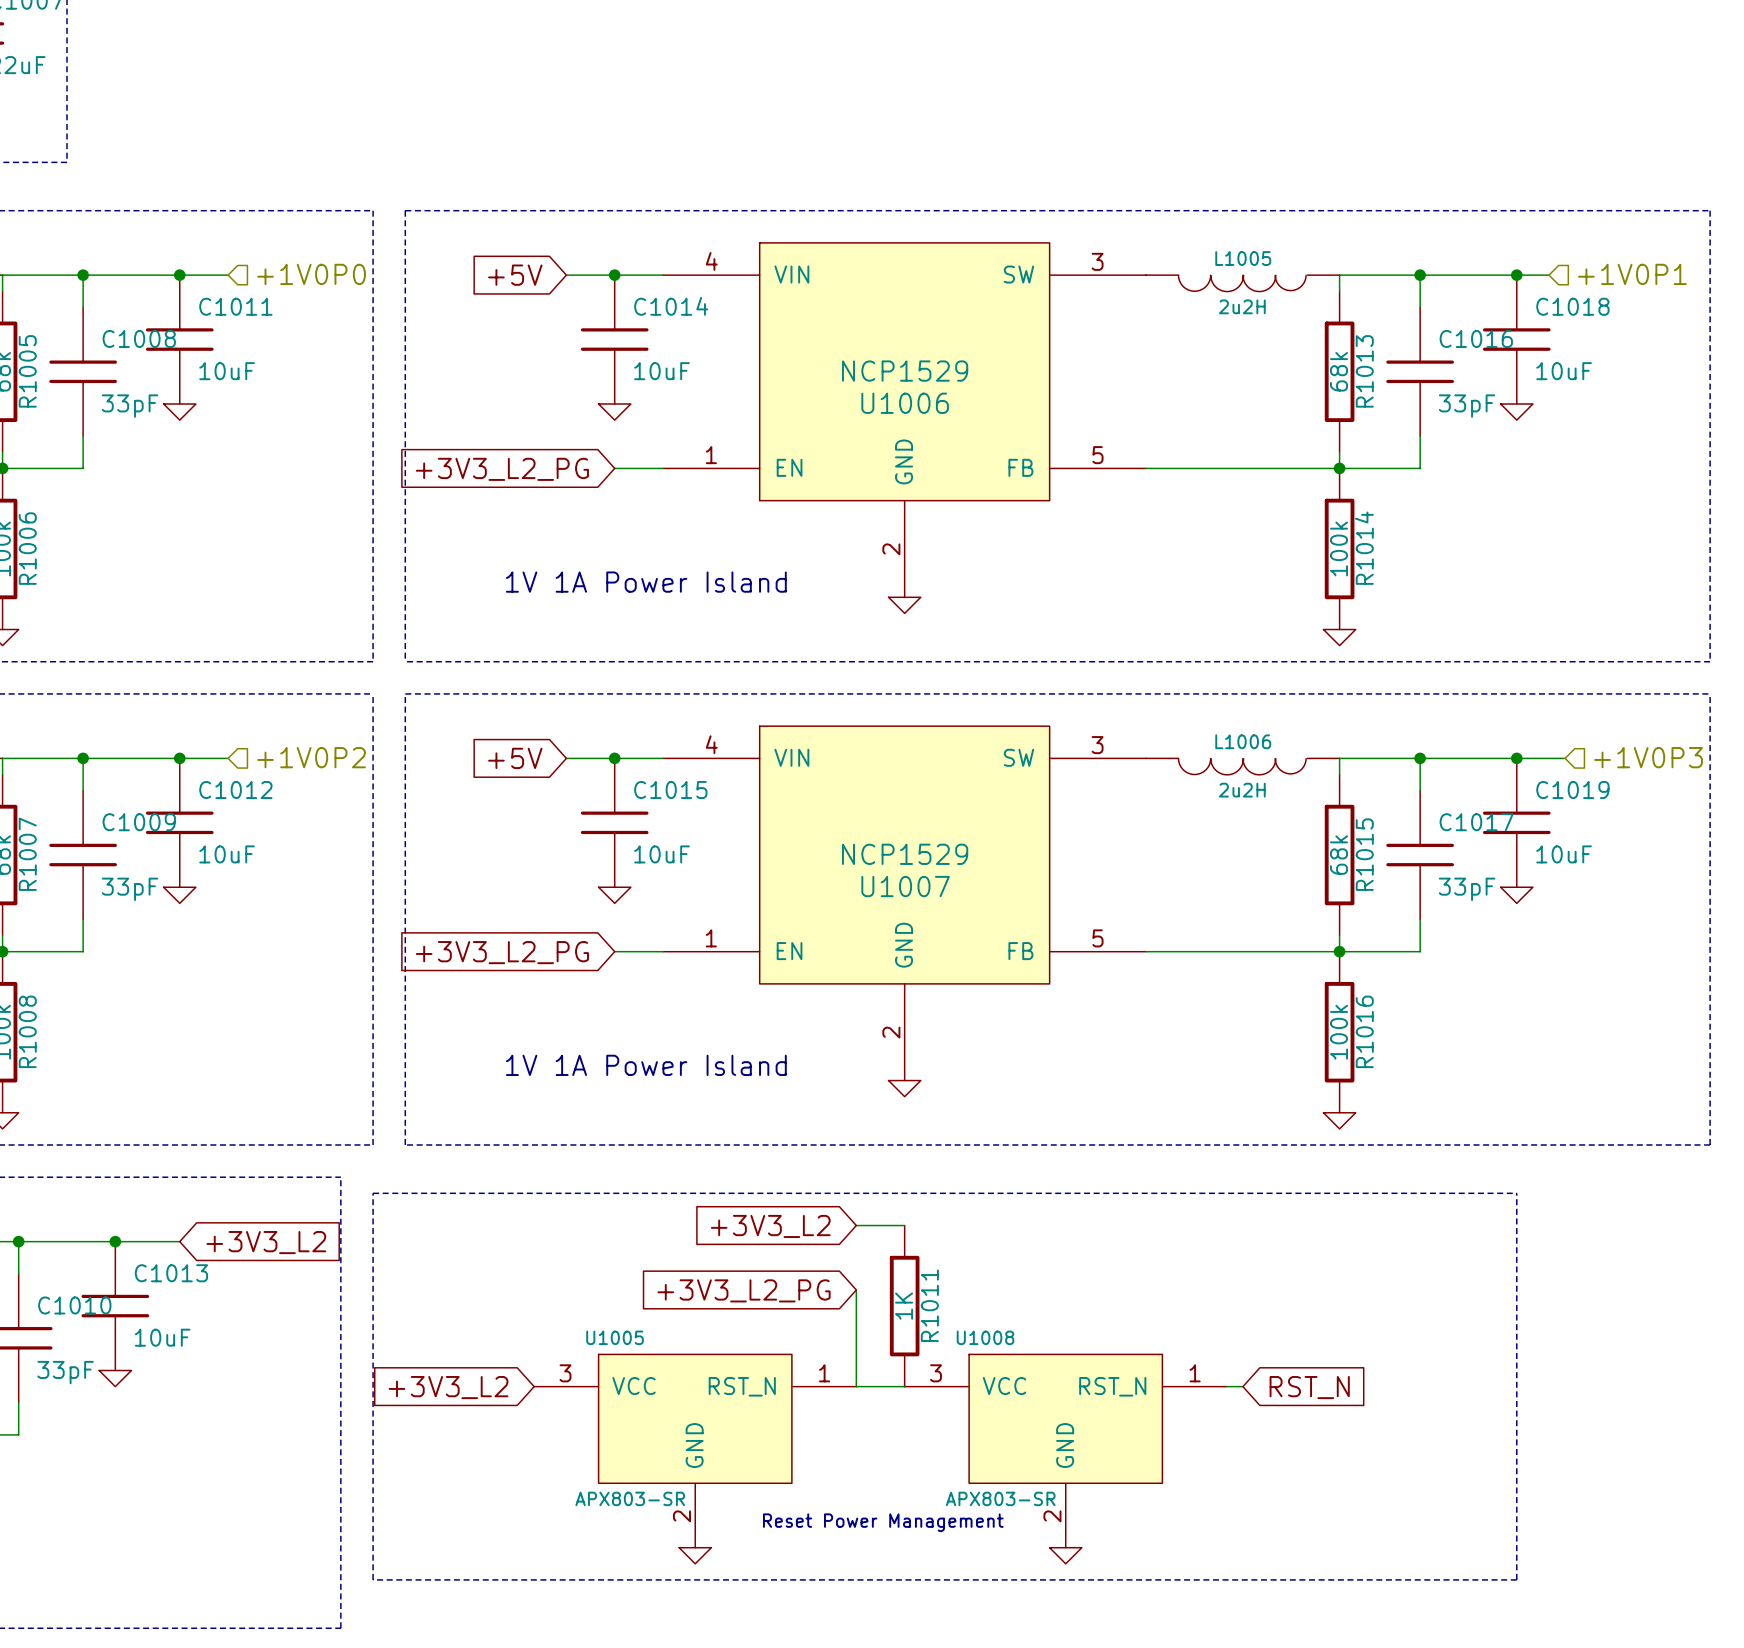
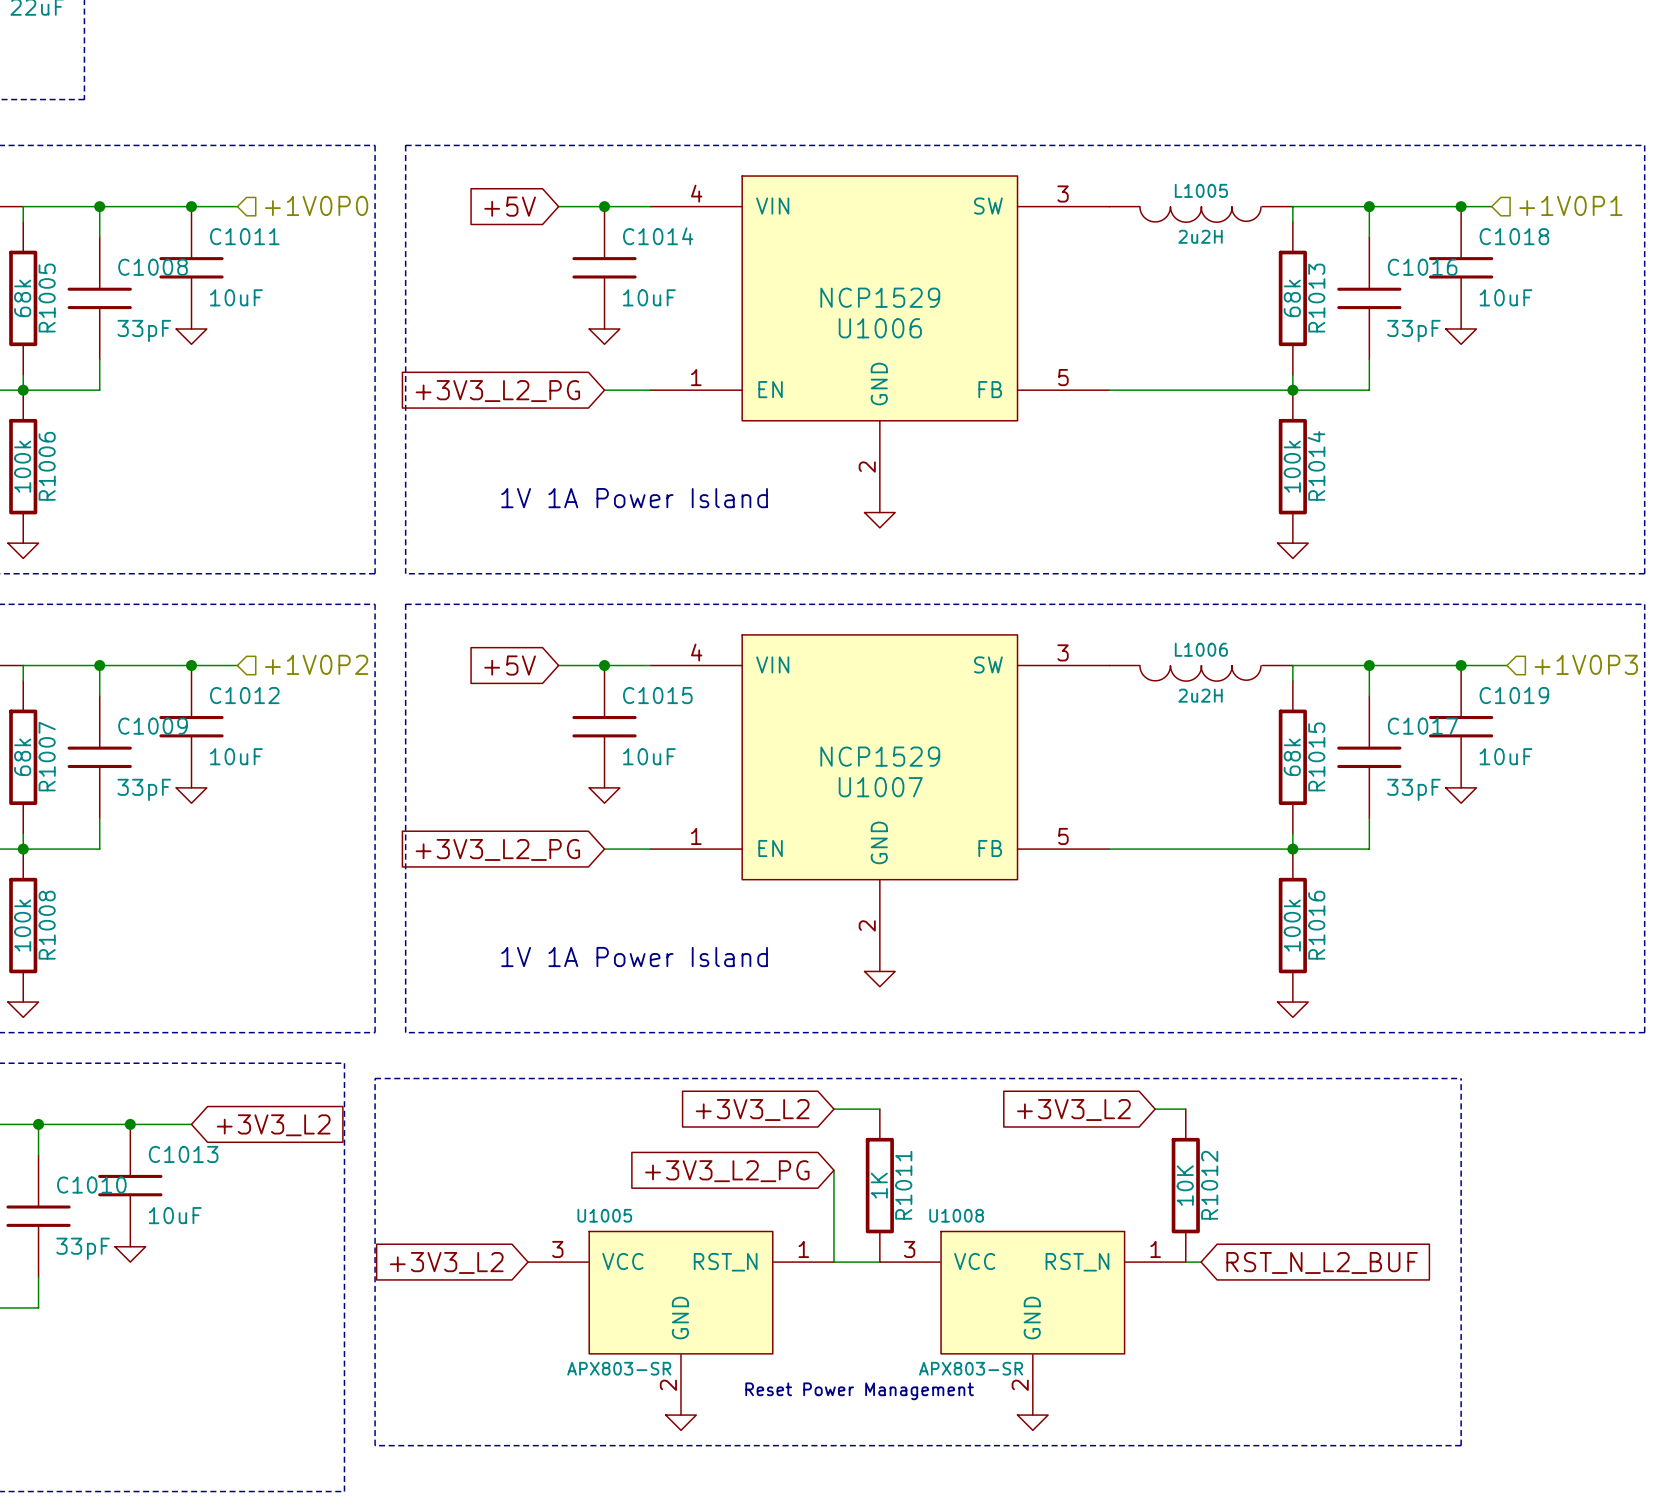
wire: none -> (1155, 1109) (1185, 1109)
global label: none -> +3V3_L2 (1073, 1109)
R1012: none -> 10K (1185, 1185)
global label: RST_N (1309, 1387) -> RST_N_L2_BUF (1322, 1262)

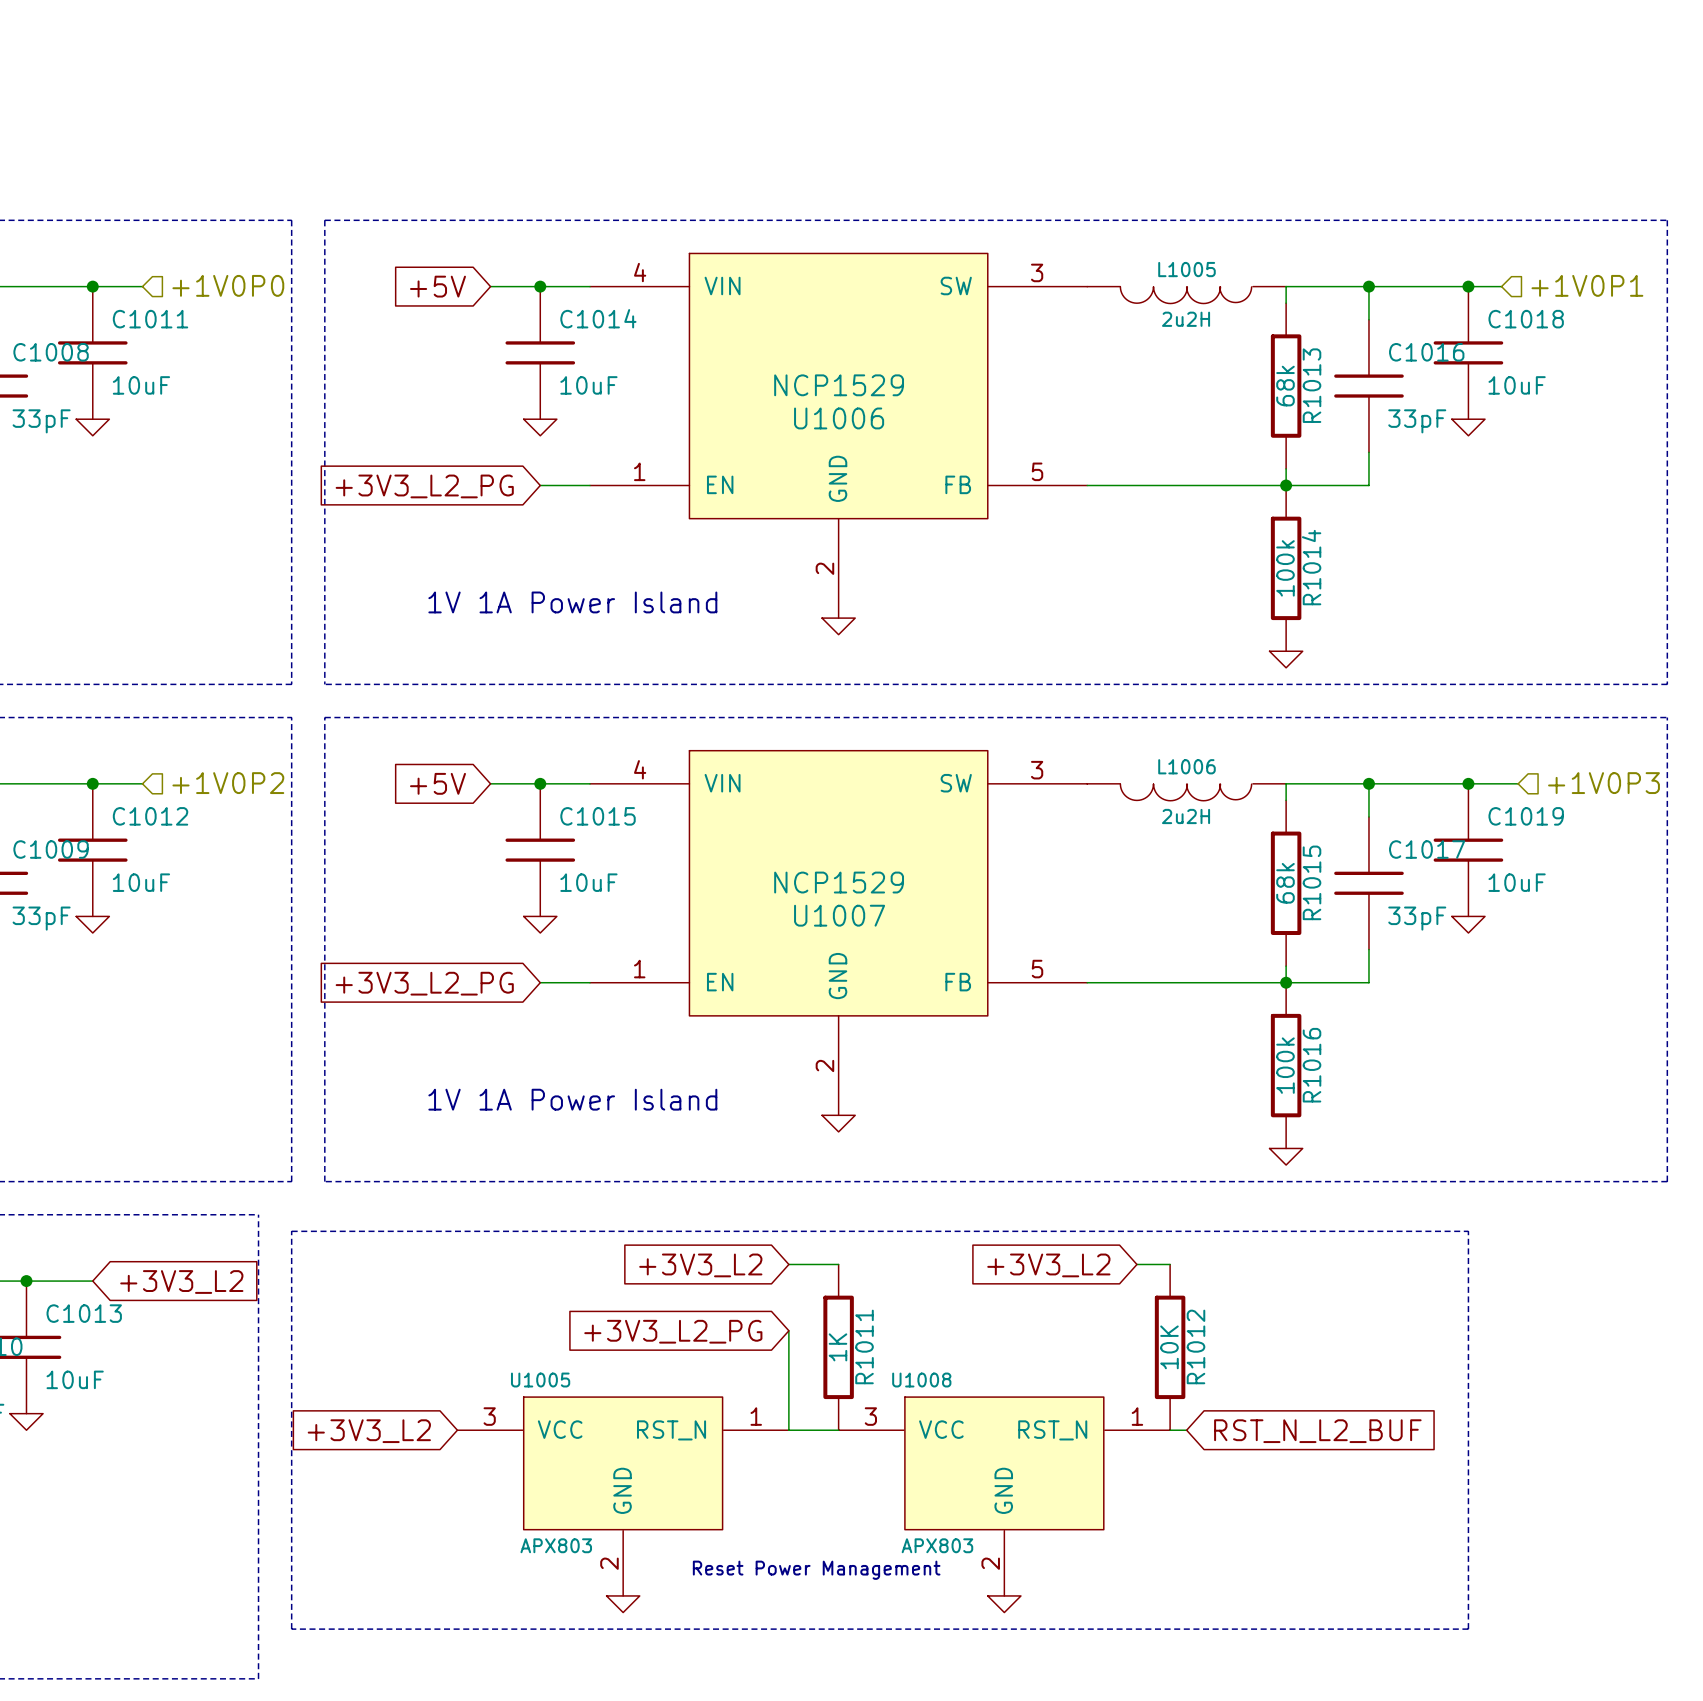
U1005 value: APX803-SR (619, 1368) -> APX803 (556, 1545)
U1008 value: APX803-SR (971, 1368) -> APX803 (937, 1545)

